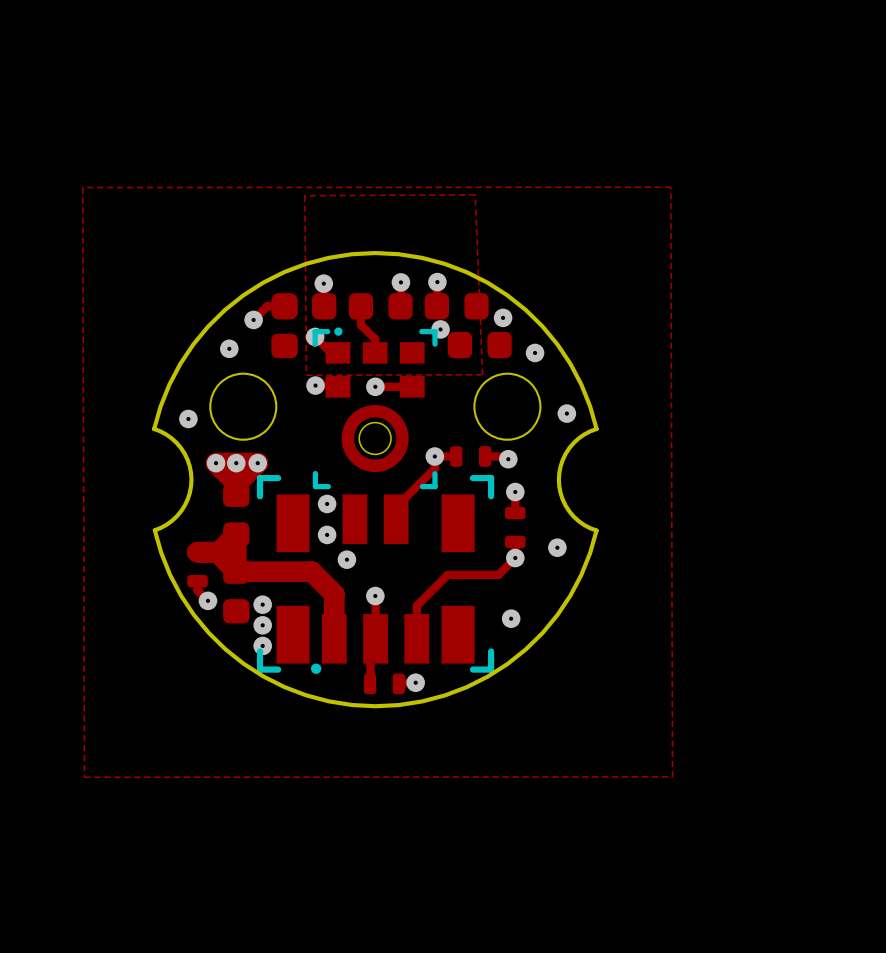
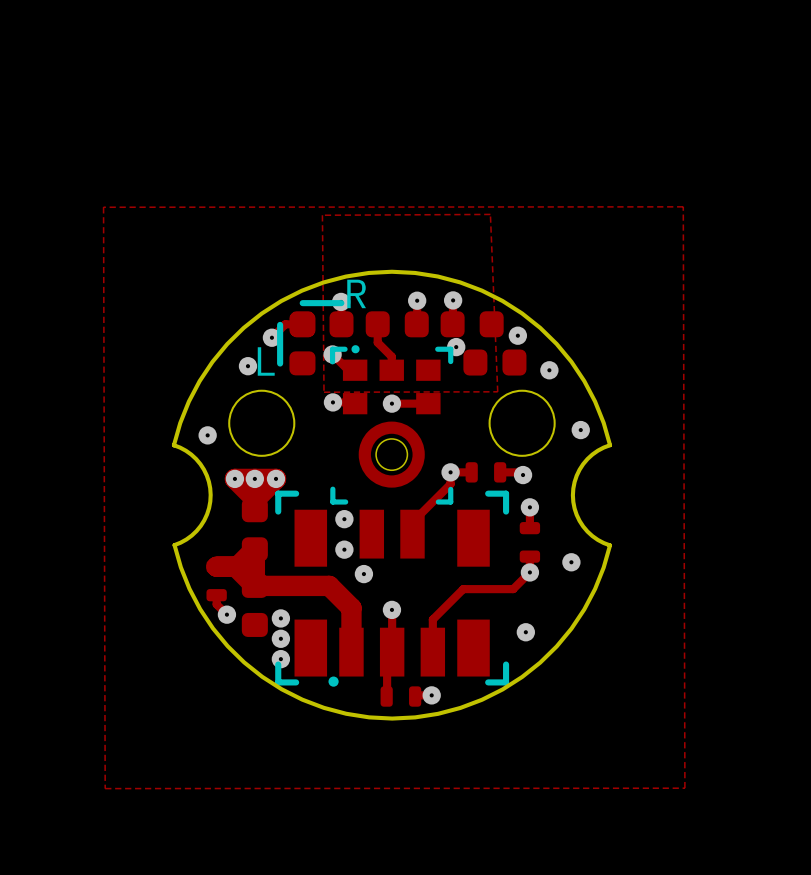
text: none -> R (356, 293)
line: none -> (302, 303) (341, 303)
line: none -> (280, 324) (280, 363)
text: none -> L (266, 361)

